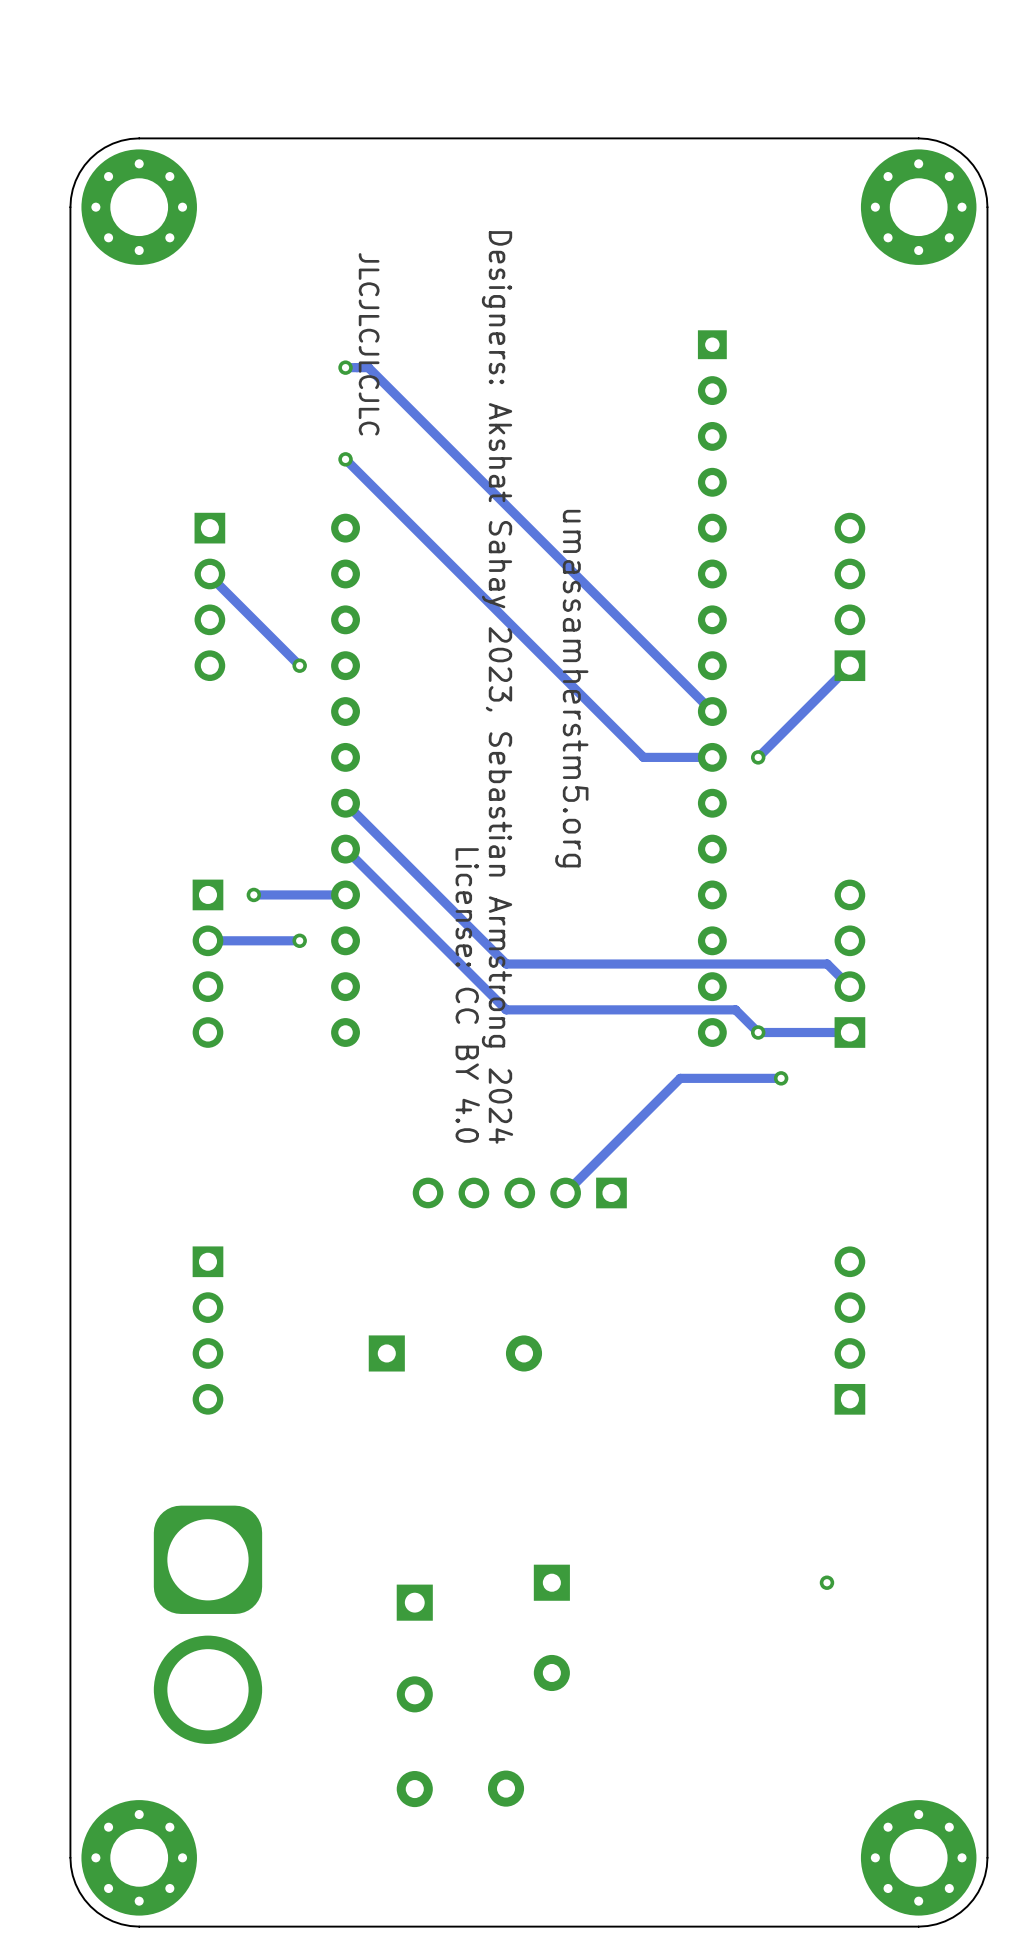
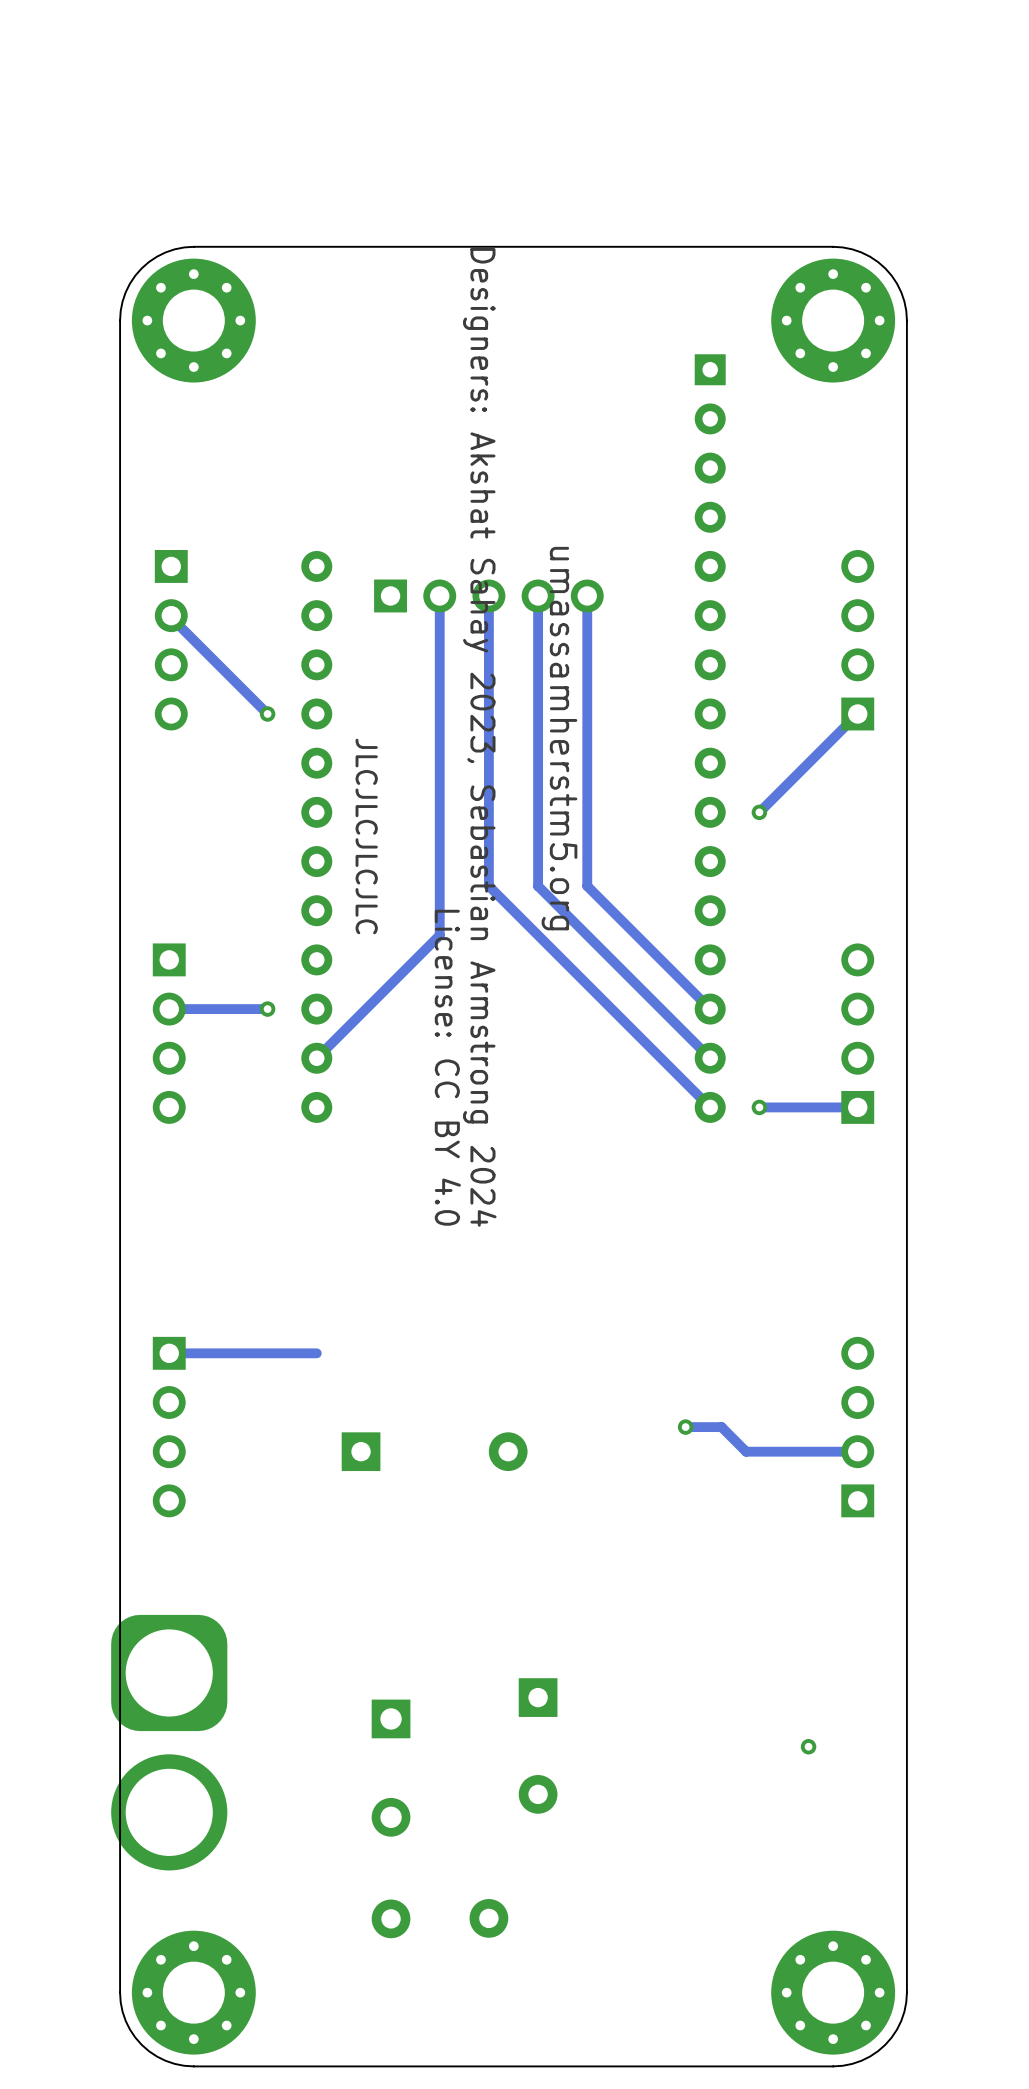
part position: (139, 207) -> (193, 320)
part position: (918, 207) -> (833, 320)
text position: JLCJLCJLCJLC (369, 344) -> JLCJLCJLCJLC (366, 836)
track: (345, 367) (368, 367) (712, 711) -> none
via: (345, 367) -> none
track: (345, 459) (643, 757) (712, 757) -> none
via: (345, 459) -> none
track: none -> (439, 595) (439, 935) (316, 1058)
track: none -> (488, 595) (488, 886) (710, 1107)
part: none -> (488, 595)
track: none -> (538, 595) (538, 886) (710, 1058)
track: none -> (587, 595) (587, 886) (710, 1009)
track: (345, 803) (506, 964) (827, 964) (849, 986) -> none
track: (345, 849) (506, 1009) (735, 1009) (758, 1032) -> none
via: (253, 894) -> none
track: (345, 894) (253, 894) -> none
track: (781, 1078) (680, 1078) (565, 1192) (565, 1189) -> none
via: (781, 1078) -> none
part: (519, 1192) -> none
track: none -> (316, 1353) (169, 1353)
track: none -> (685, 1427) (721, 1427) (746, 1451) (857, 1451)
via: none -> (685, 1427)
via position: (826, 1582) -> (808, 1746)
part position: (139, 1857) -> (193, 1992)
part position: (918, 1857) -> (833, 1992)
board edge: (826, 1926) (918, 1926) (945, 1921) (967, 1906) (978, 1892) (985, 1875) (987, 1857) (987, 207) (982, 180) (967, 158) (945, 143) (918, 138) (139, 138) (121, 140) (104, 147) (90, 158) (75, 180) (70, 207) (71, 1866) (75, 1884) (84, 1899) (97, 1912) (112, 1921) (139, 1926) (230, 1926) -> (833, 2066) (861, 2060) (885, 2044) (901, 2020) (906, 1992) (906, 320) (901, 292) (885, 268) (861, 252) (833, 246) (193, 246) (165, 252) (148, 262) (135, 275) (125, 292) (120, 320) (120, 1992) (125, 2020) (141, 2044) (165, 2060) (193, 2066)

